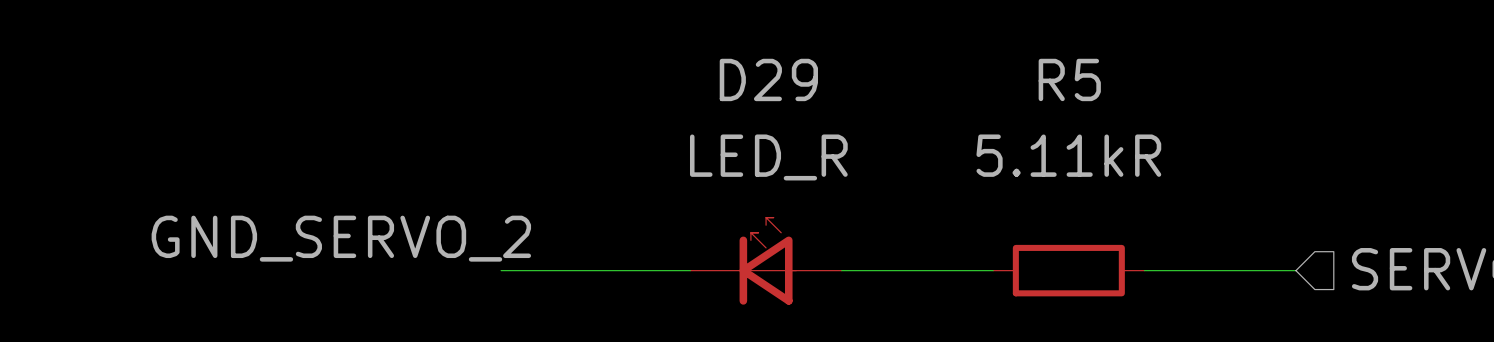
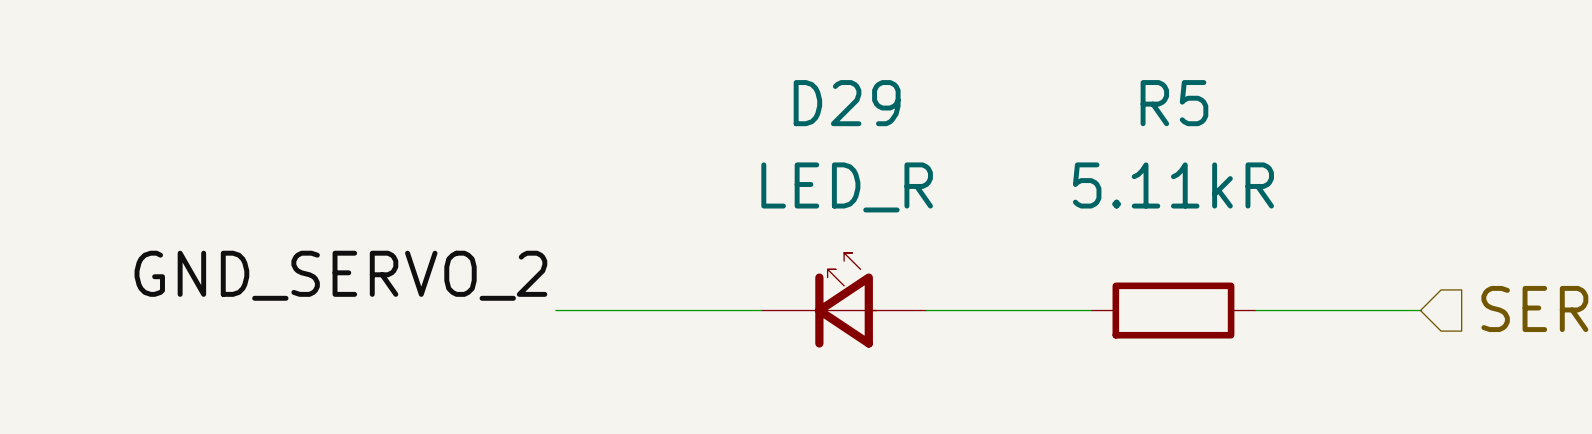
label position: GND_SERVO_2 (341, 238) -> GND_SERVO_2 (340, 275)

